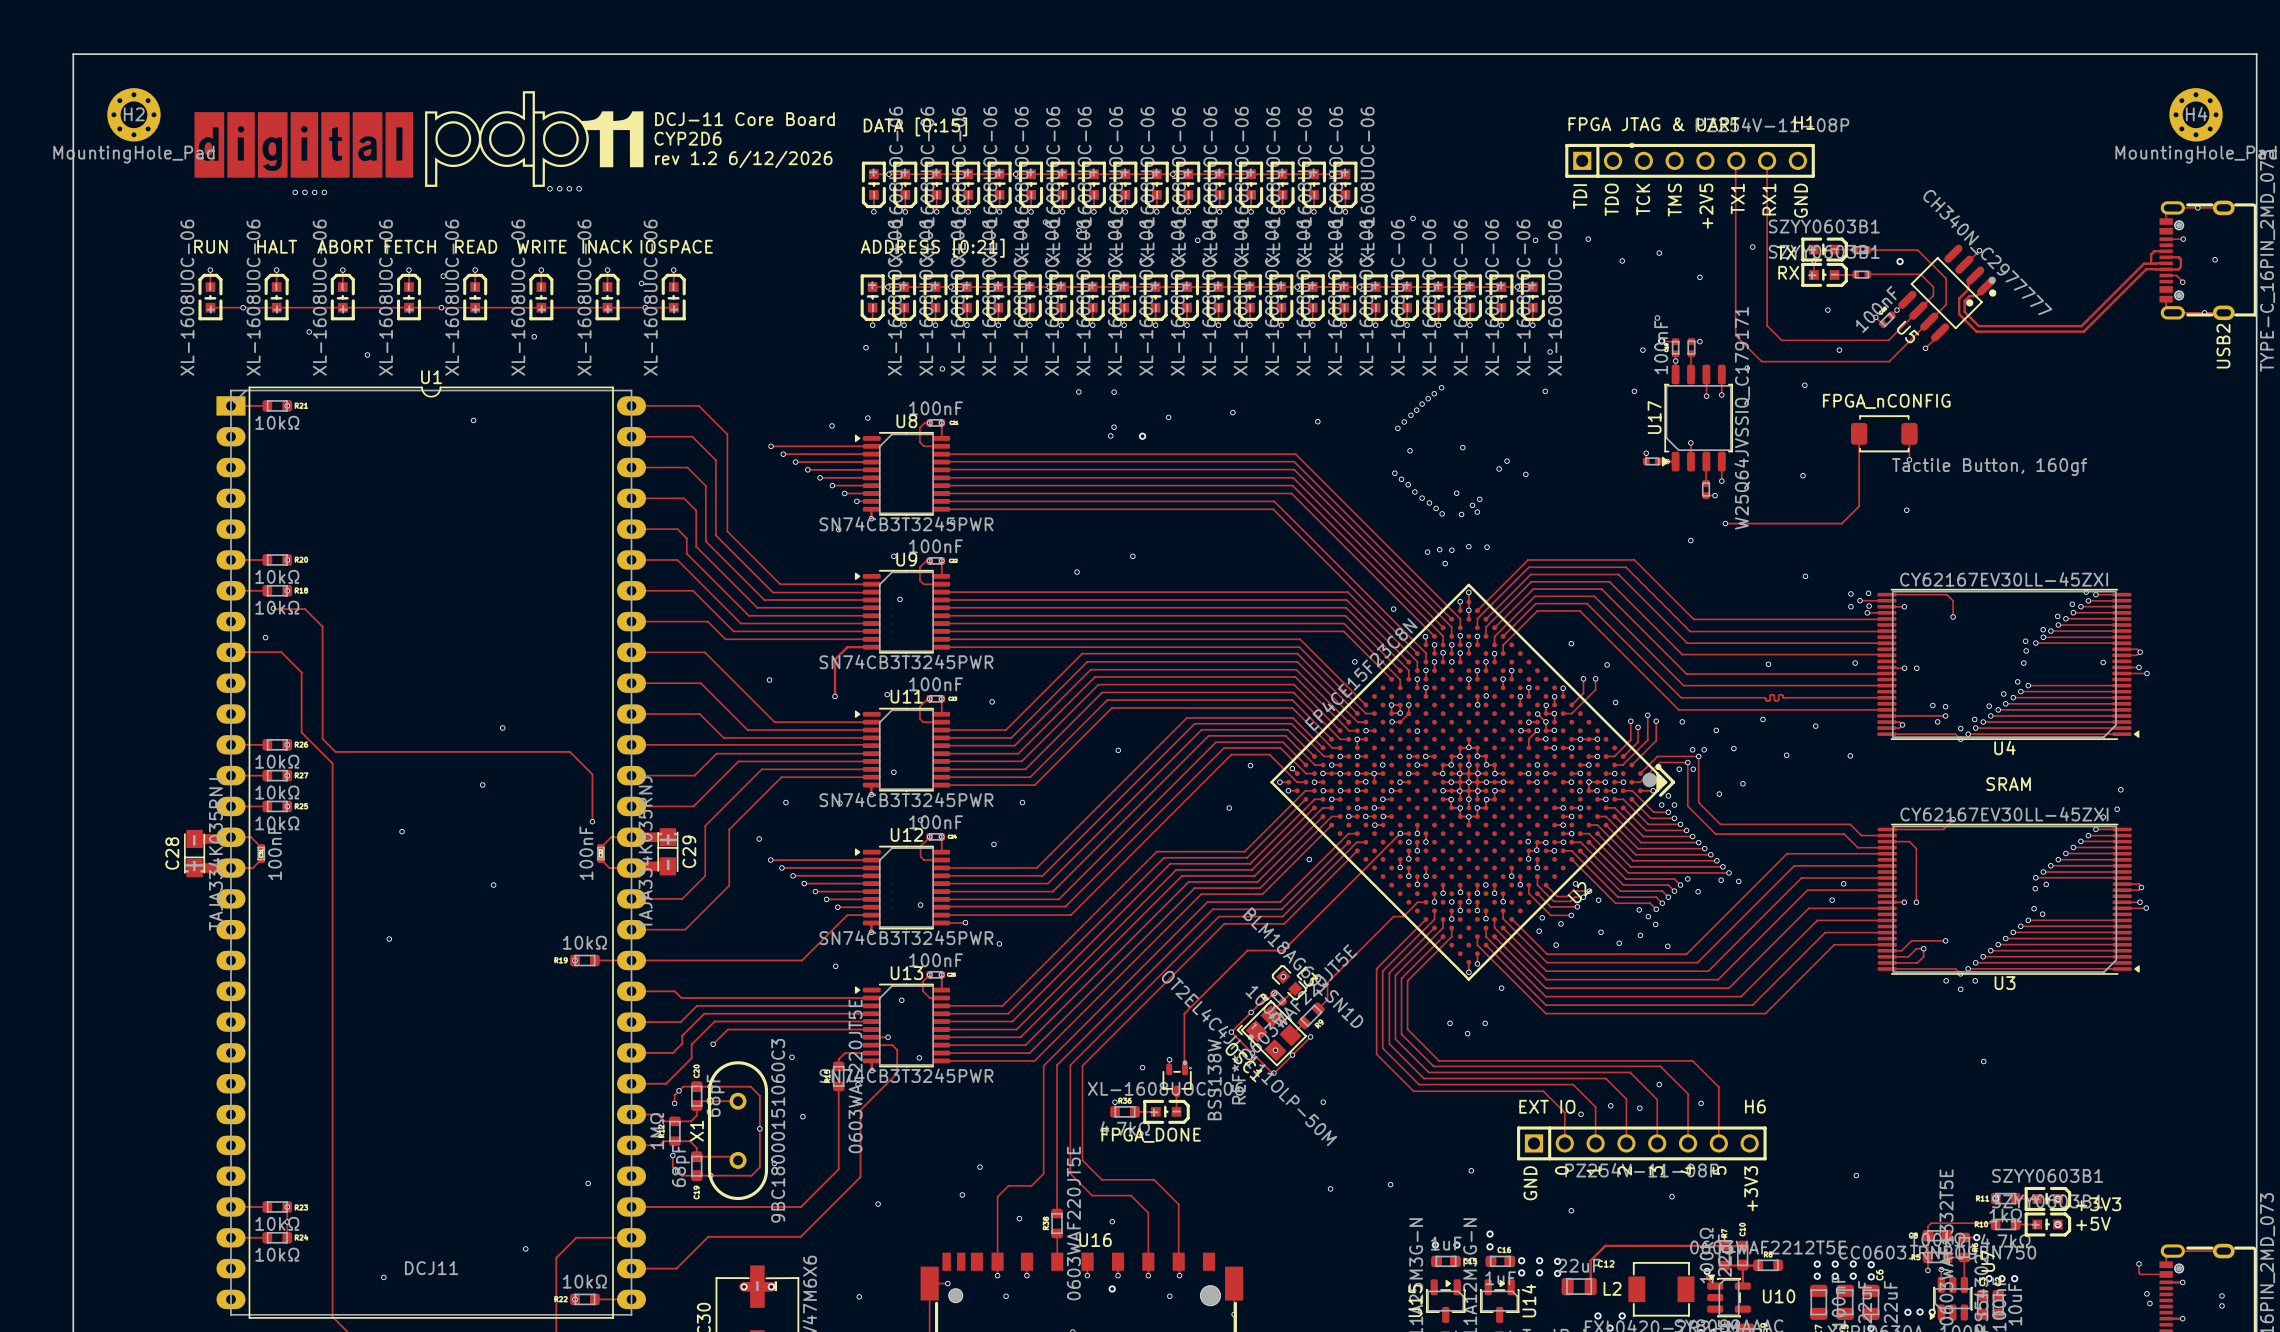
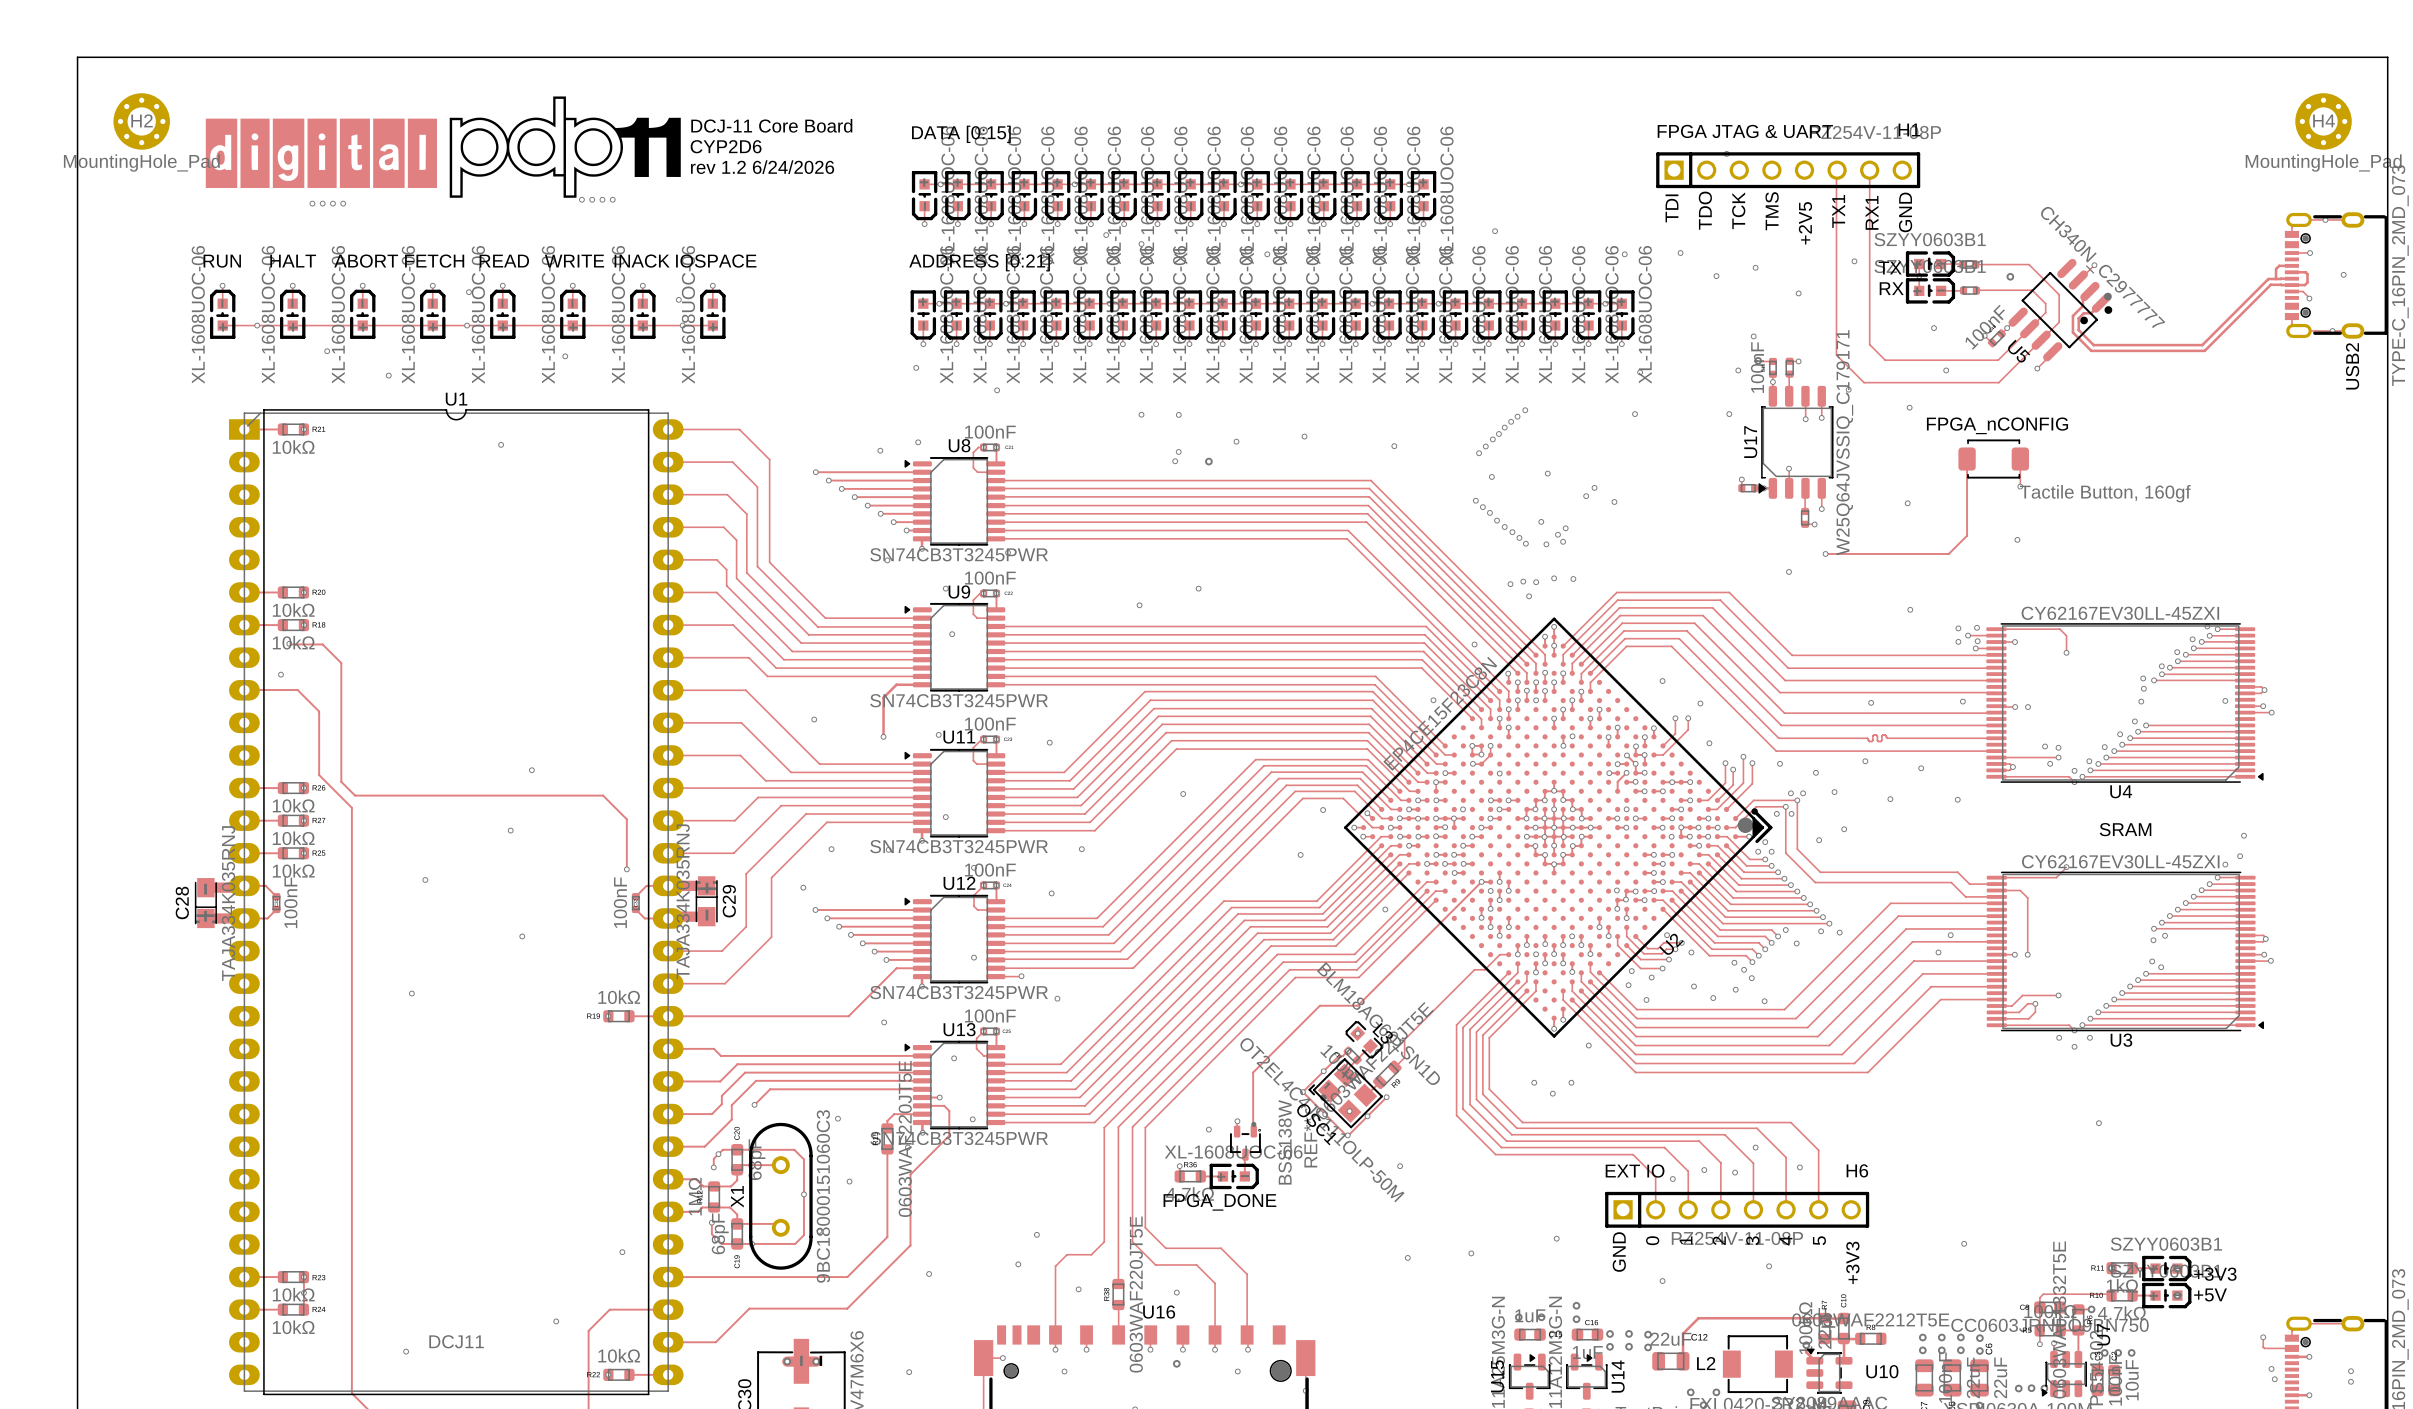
text: rev 1.2 6/12/2026 (743, 159) -> rev 1.2 6/24/2026 (762, 167)

